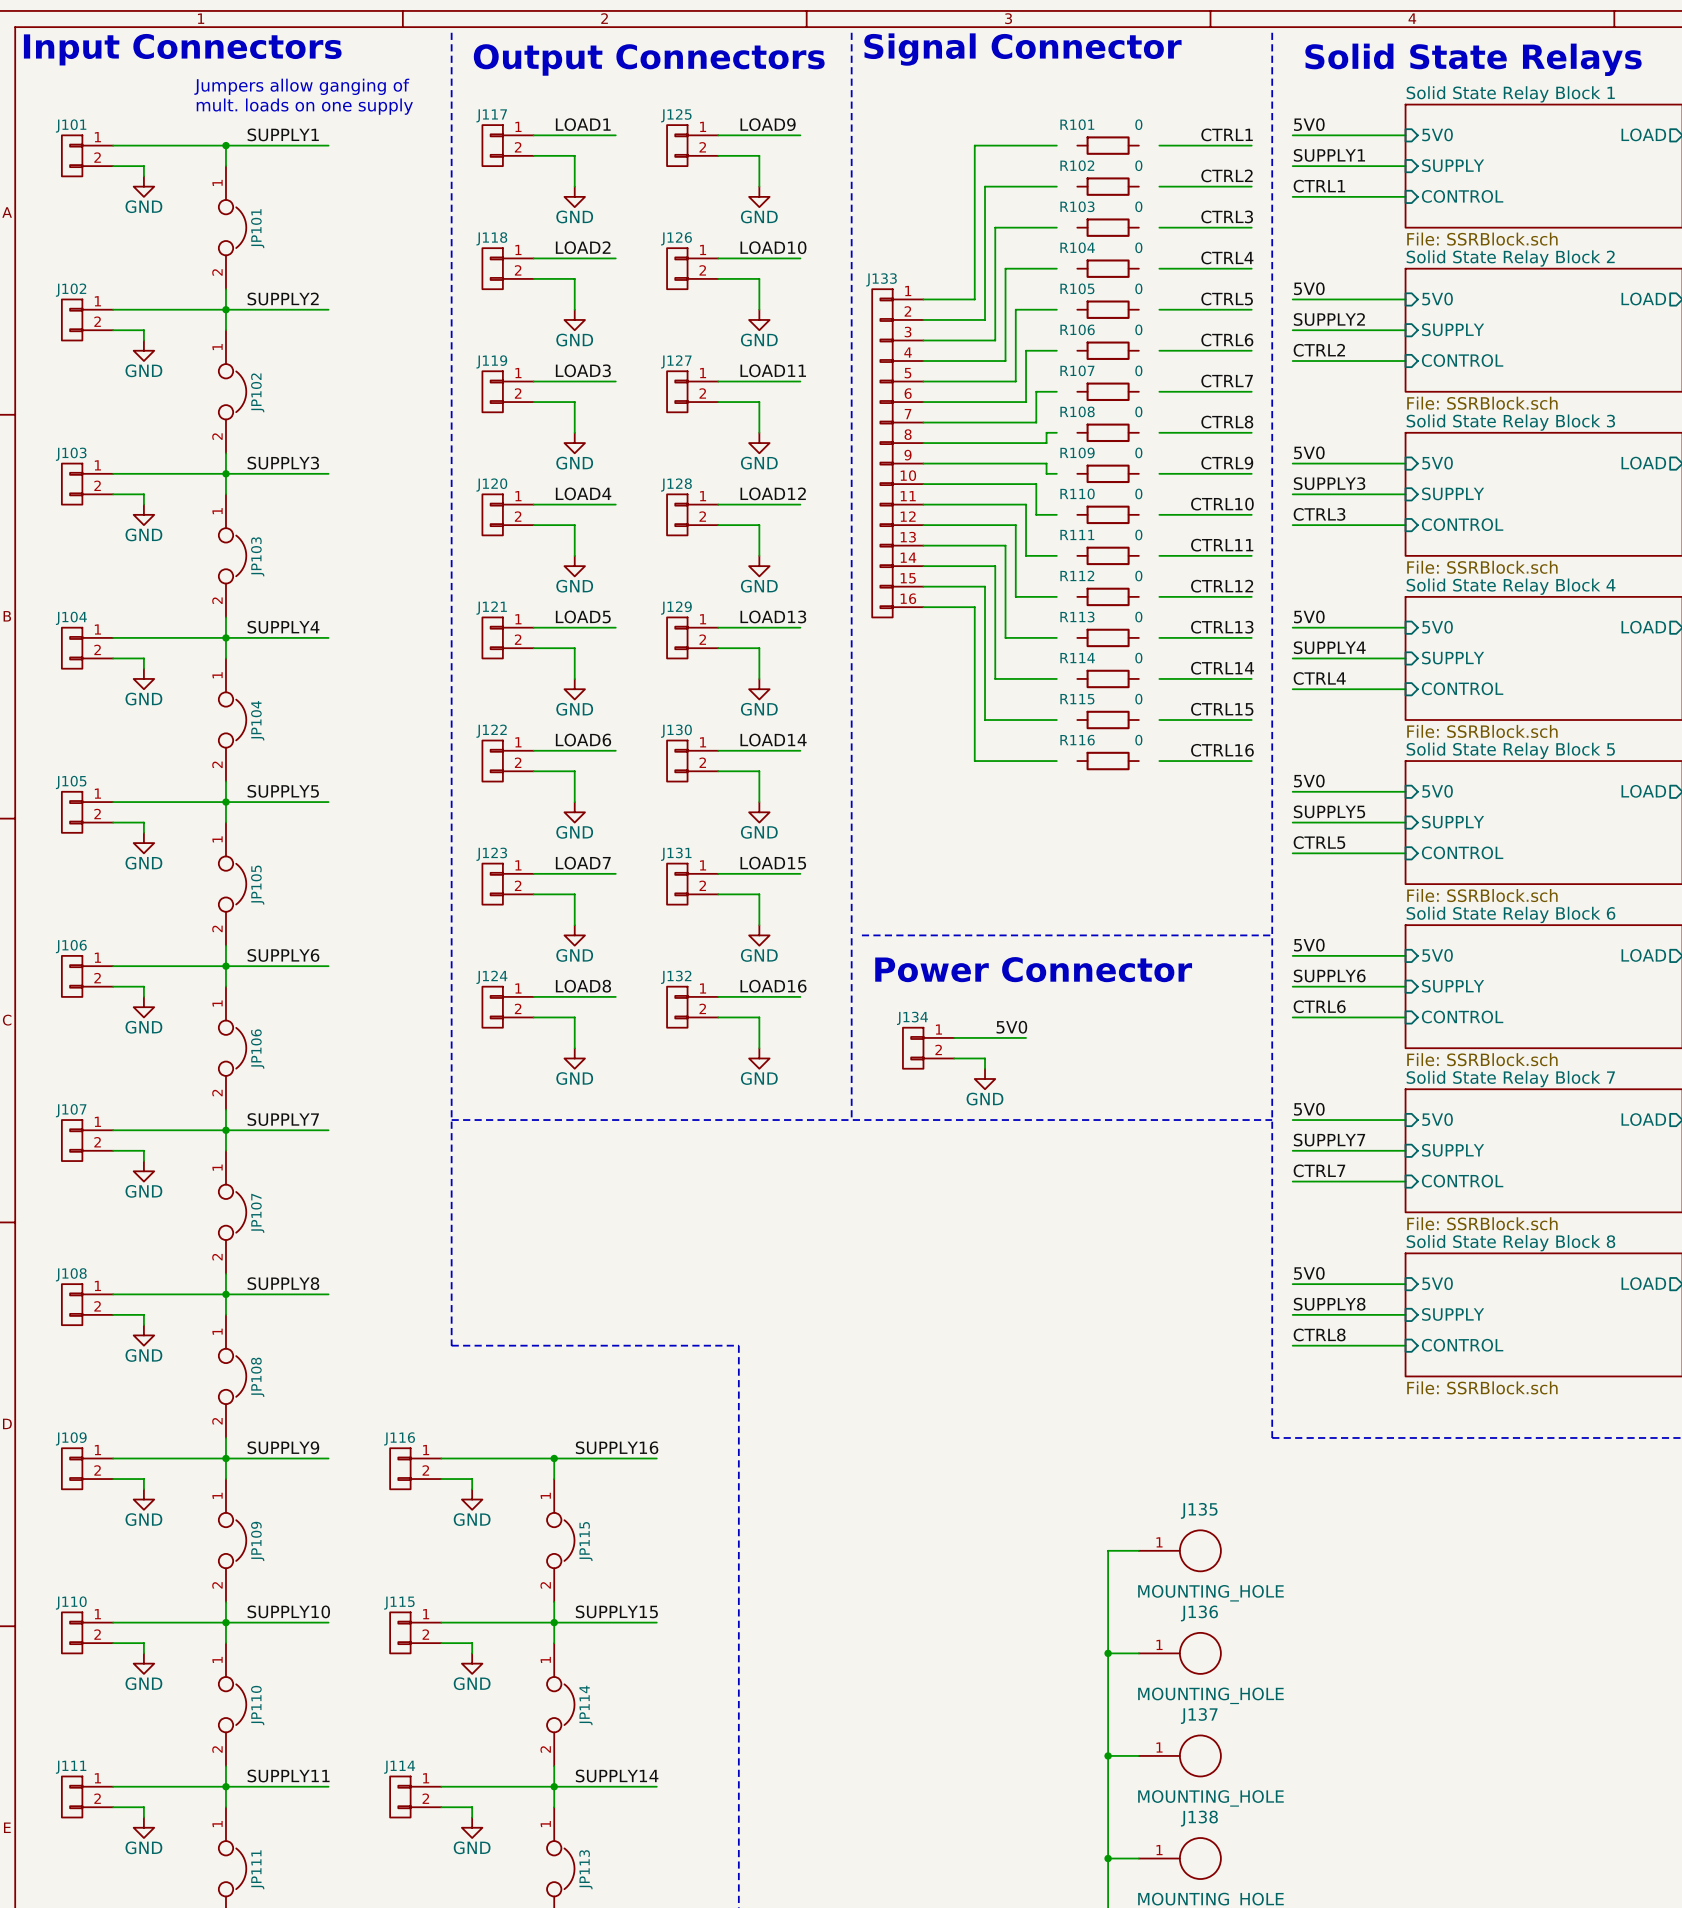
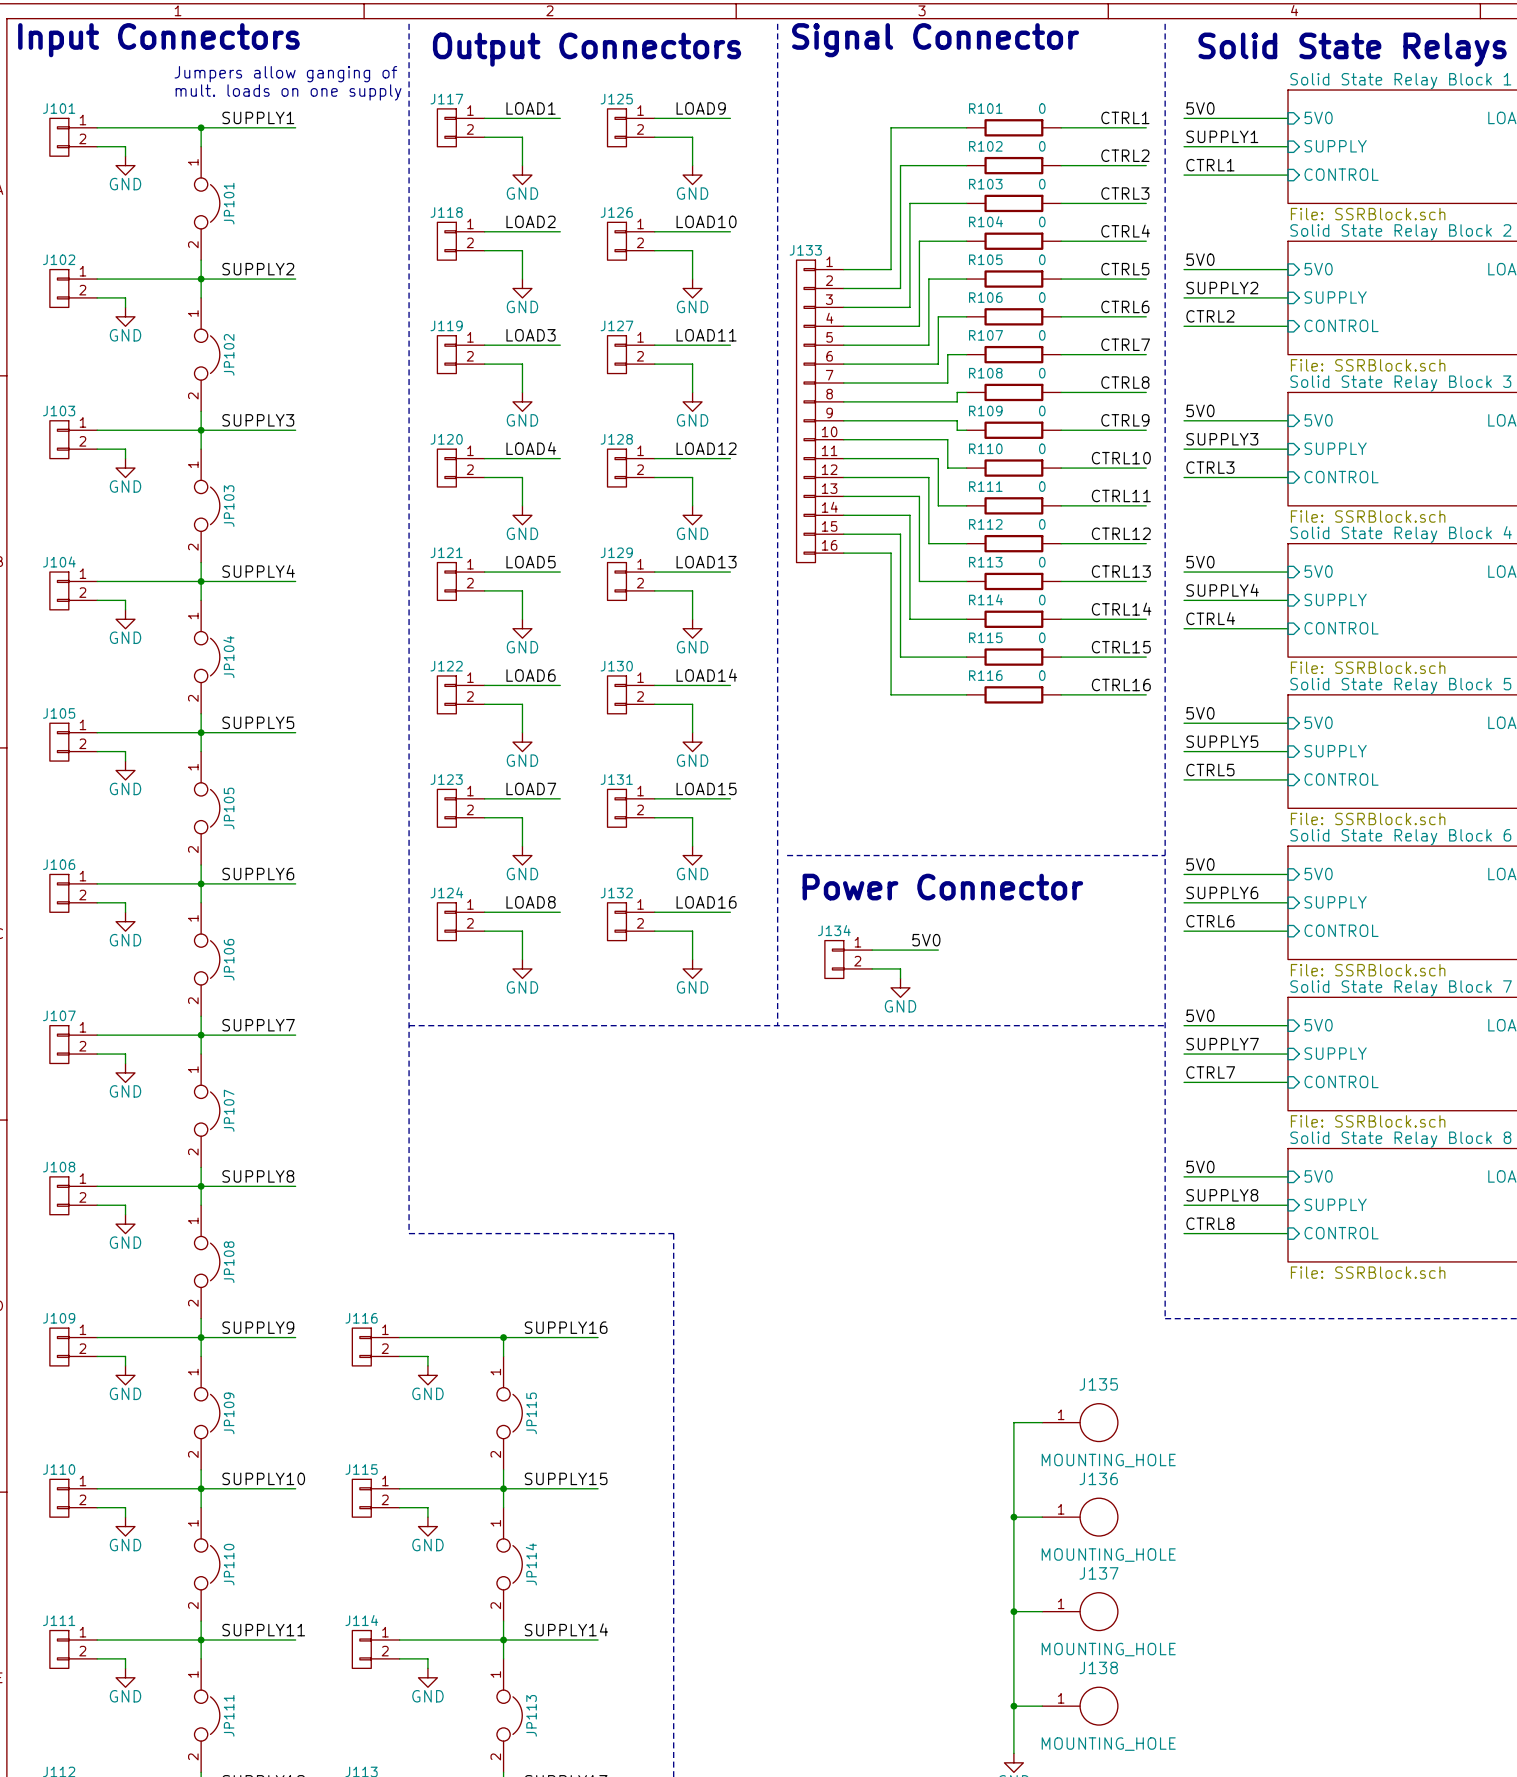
R101 symbol: [1077, 136, 1139, 155] -> [966, 119, 1062, 137]
R102 symbol: [1077, 177, 1139, 196] -> [966, 156, 1062, 175]
R103 symbol: [1077, 218, 1139, 237] -> [966, 194, 1062, 213]
R104 symbol: [1077, 259, 1139, 278] -> [966, 232, 1062, 250]
R105 symbol: [1077, 300, 1139, 319] -> [966, 270, 1062, 288]
R106 symbol: [1077, 341, 1139, 360] -> [966, 308, 1062, 326]
R107 symbol: [1077, 382, 1139, 402] -> [966, 345, 1062, 364]
R108 symbol: [1077, 423, 1139, 443] -> [966, 383, 1062, 402]
R109 symbol: [1077, 464, 1139, 484] -> [966, 421, 1062, 439]
R110 symbol: [1077, 505, 1139, 525] -> [966, 459, 1062, 477]
R111 symbol: [1077, 546, 1139, 566] -> [966, 497, 1062, 515]
R112 symbol: [1077, 587, 1139, 607] -> [966, 534, 1062, 553]
R113 symbol: [1077, 628, 1139, 648] -> [966, 572, 1062, 591]
R114 symbol: [1077, 669, 1139, 689] -> [966, 610, 1062, 628]
R115 symbol: [1077, 710, 1139, 730] -> [966, 648, 1062, 666]
R116 symbol: [1077, 751, 1139, 771] -> [966, 686, 1062, 704]

